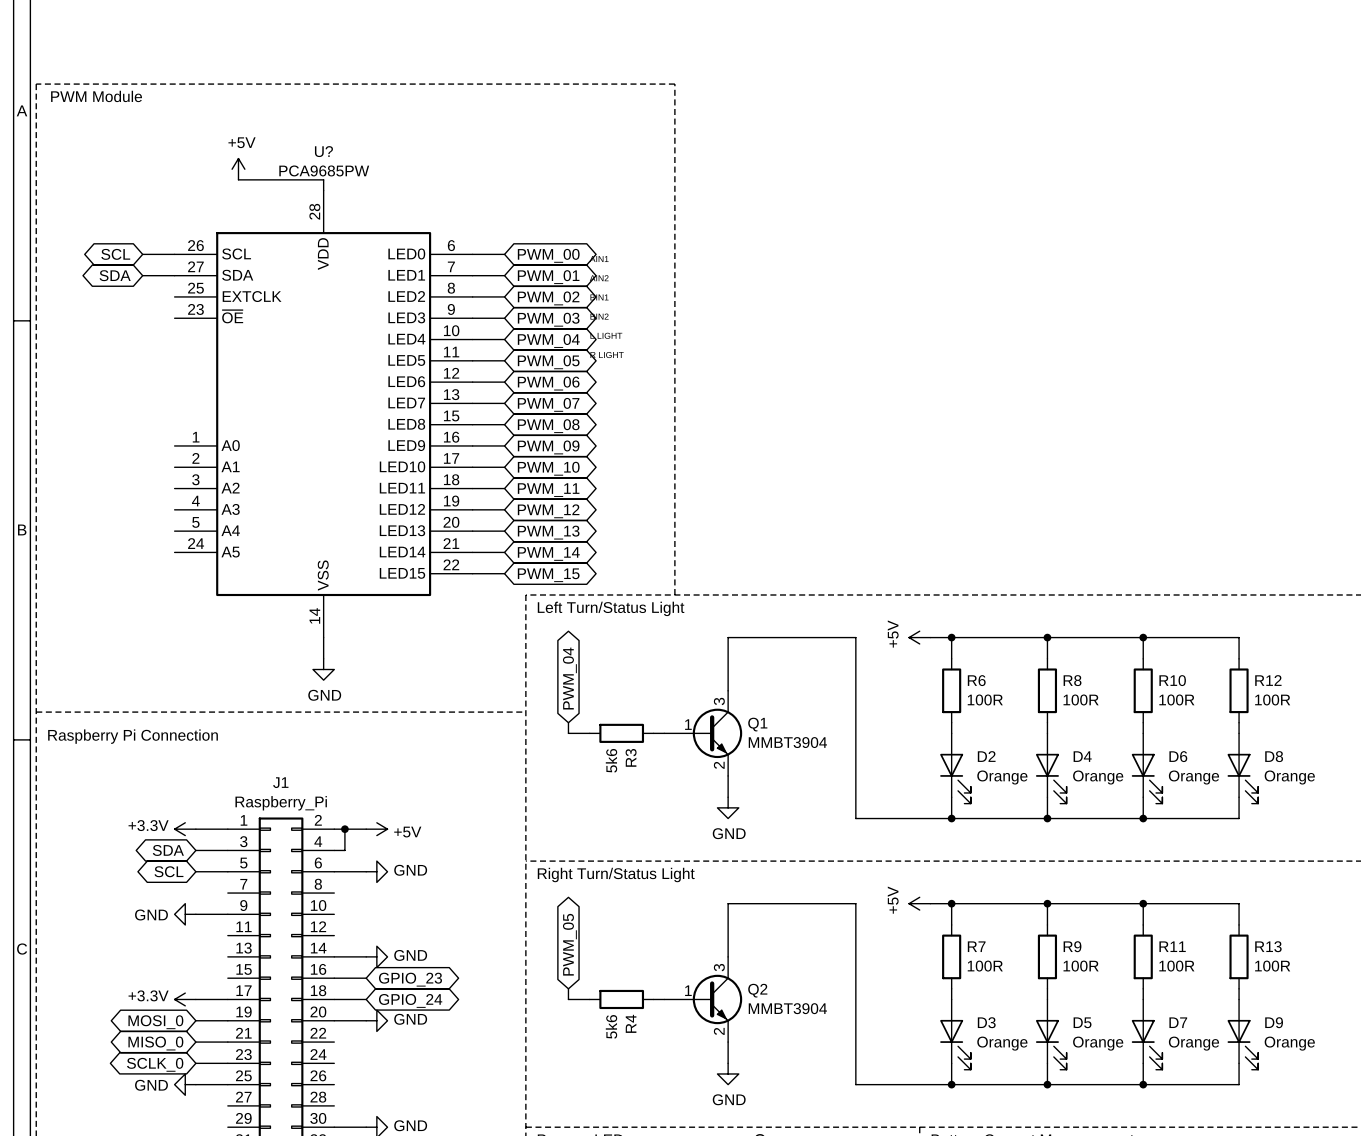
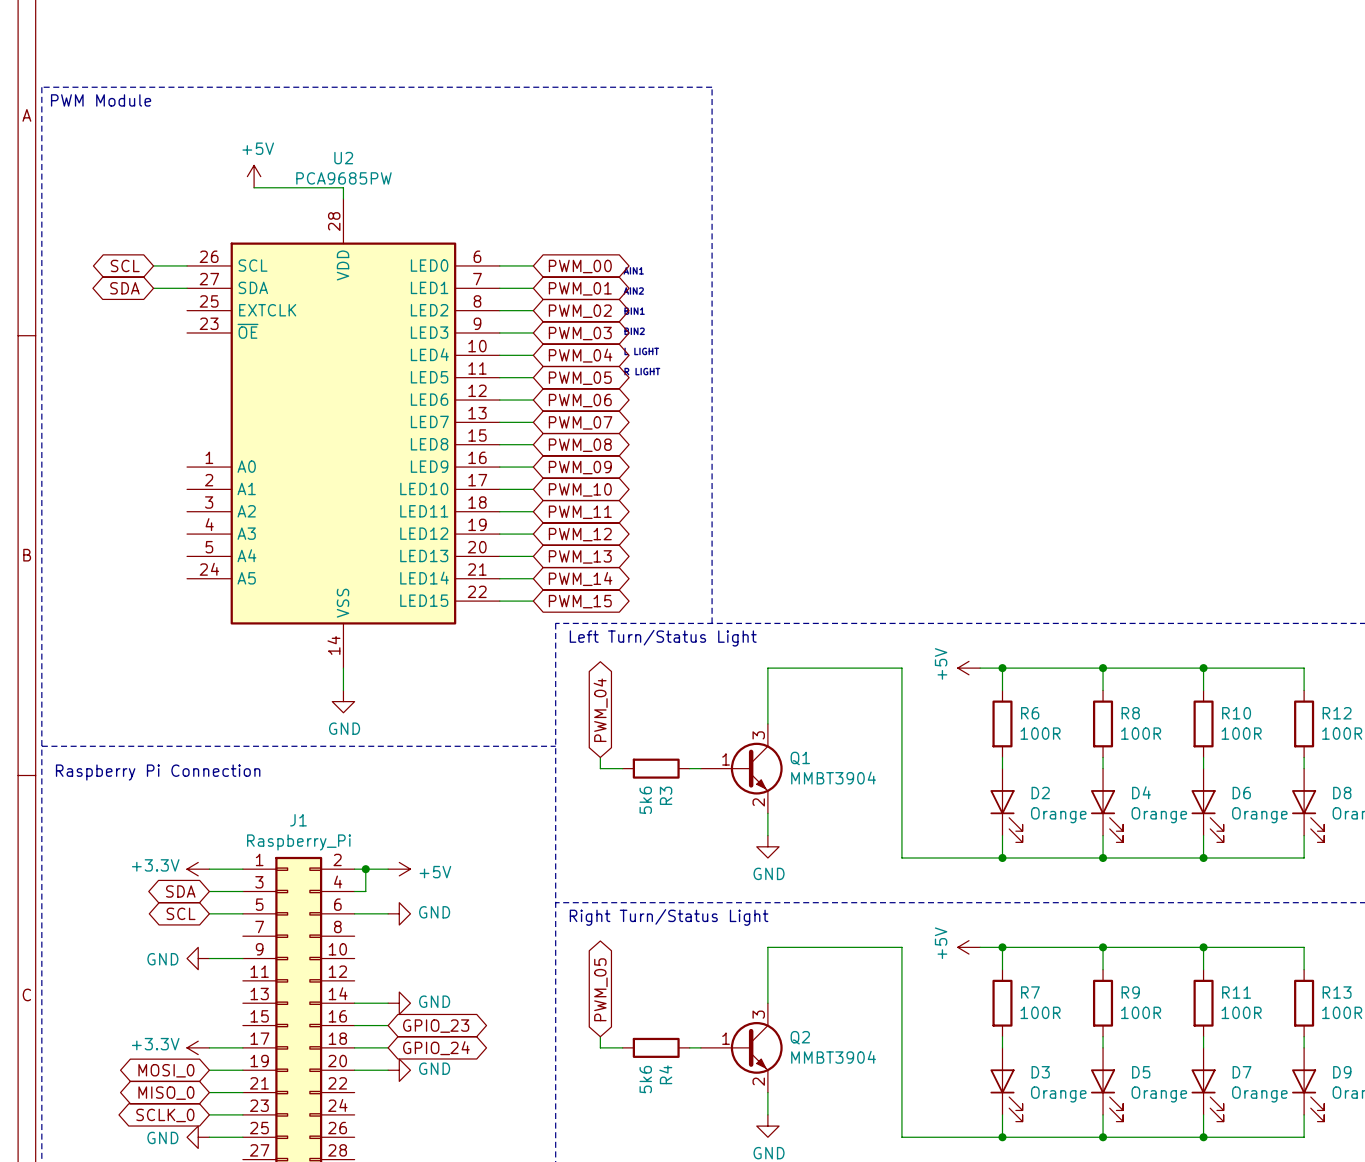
U? name: U? (323, 151) -> U2 (343, 158)

